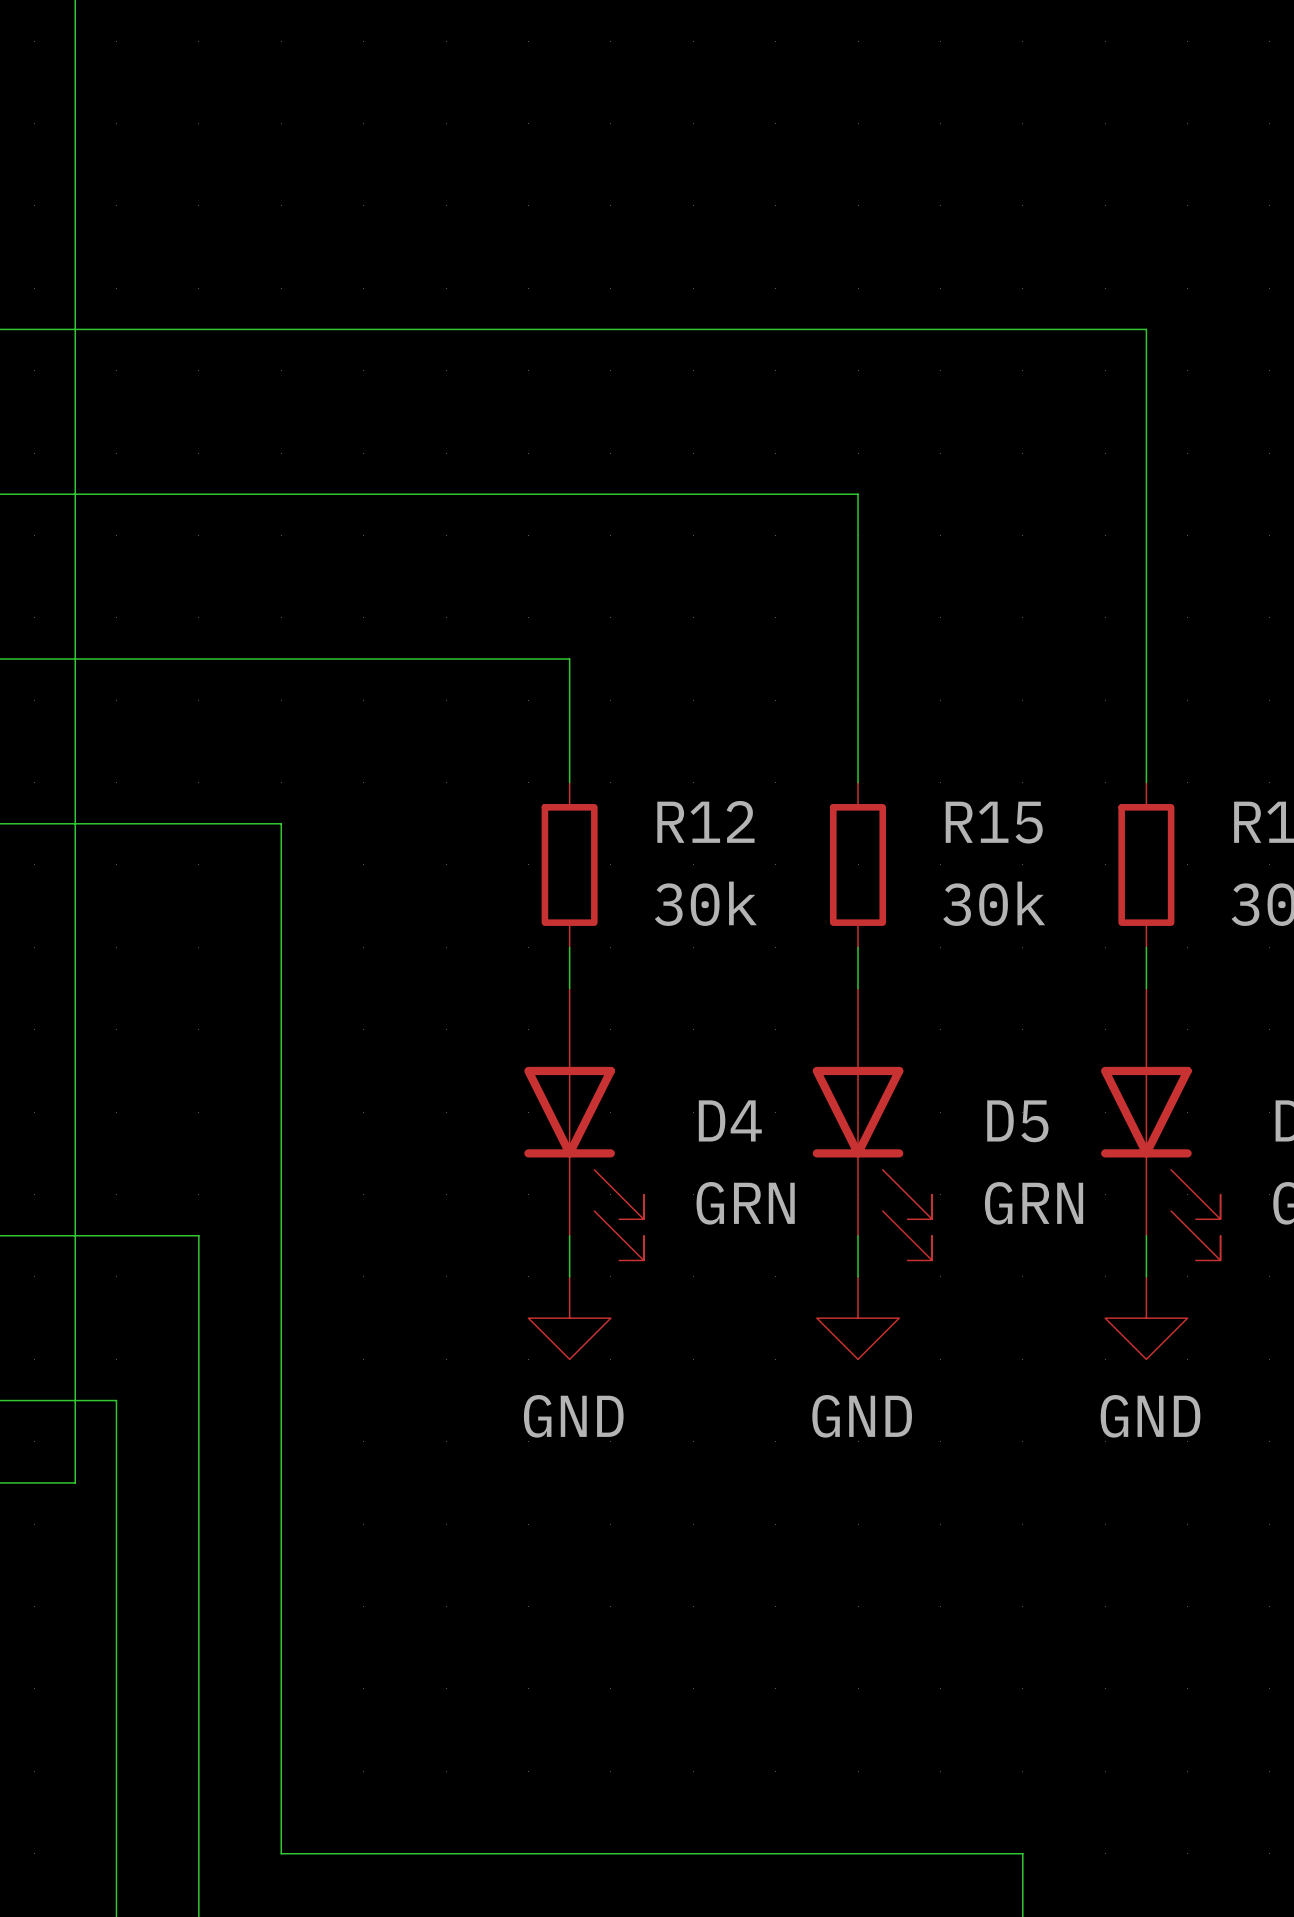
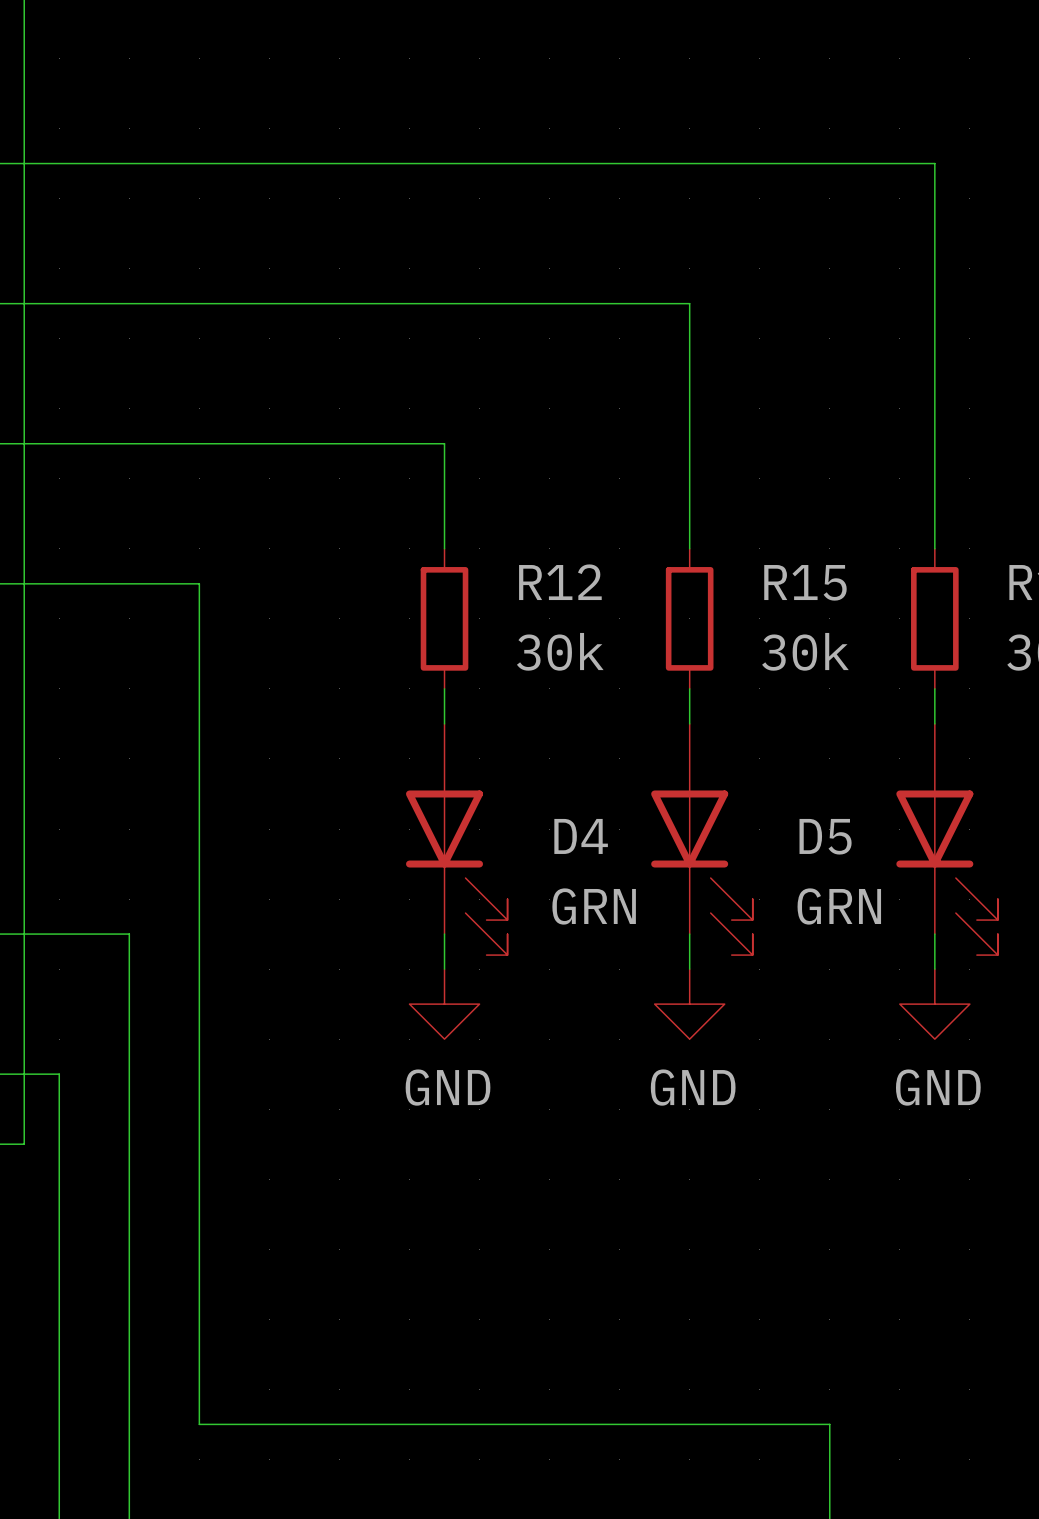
wire: (281, 1812) (281, 1853) (1022, 1853) -> (199, 1424) (829, 1424) (829, 1459)

